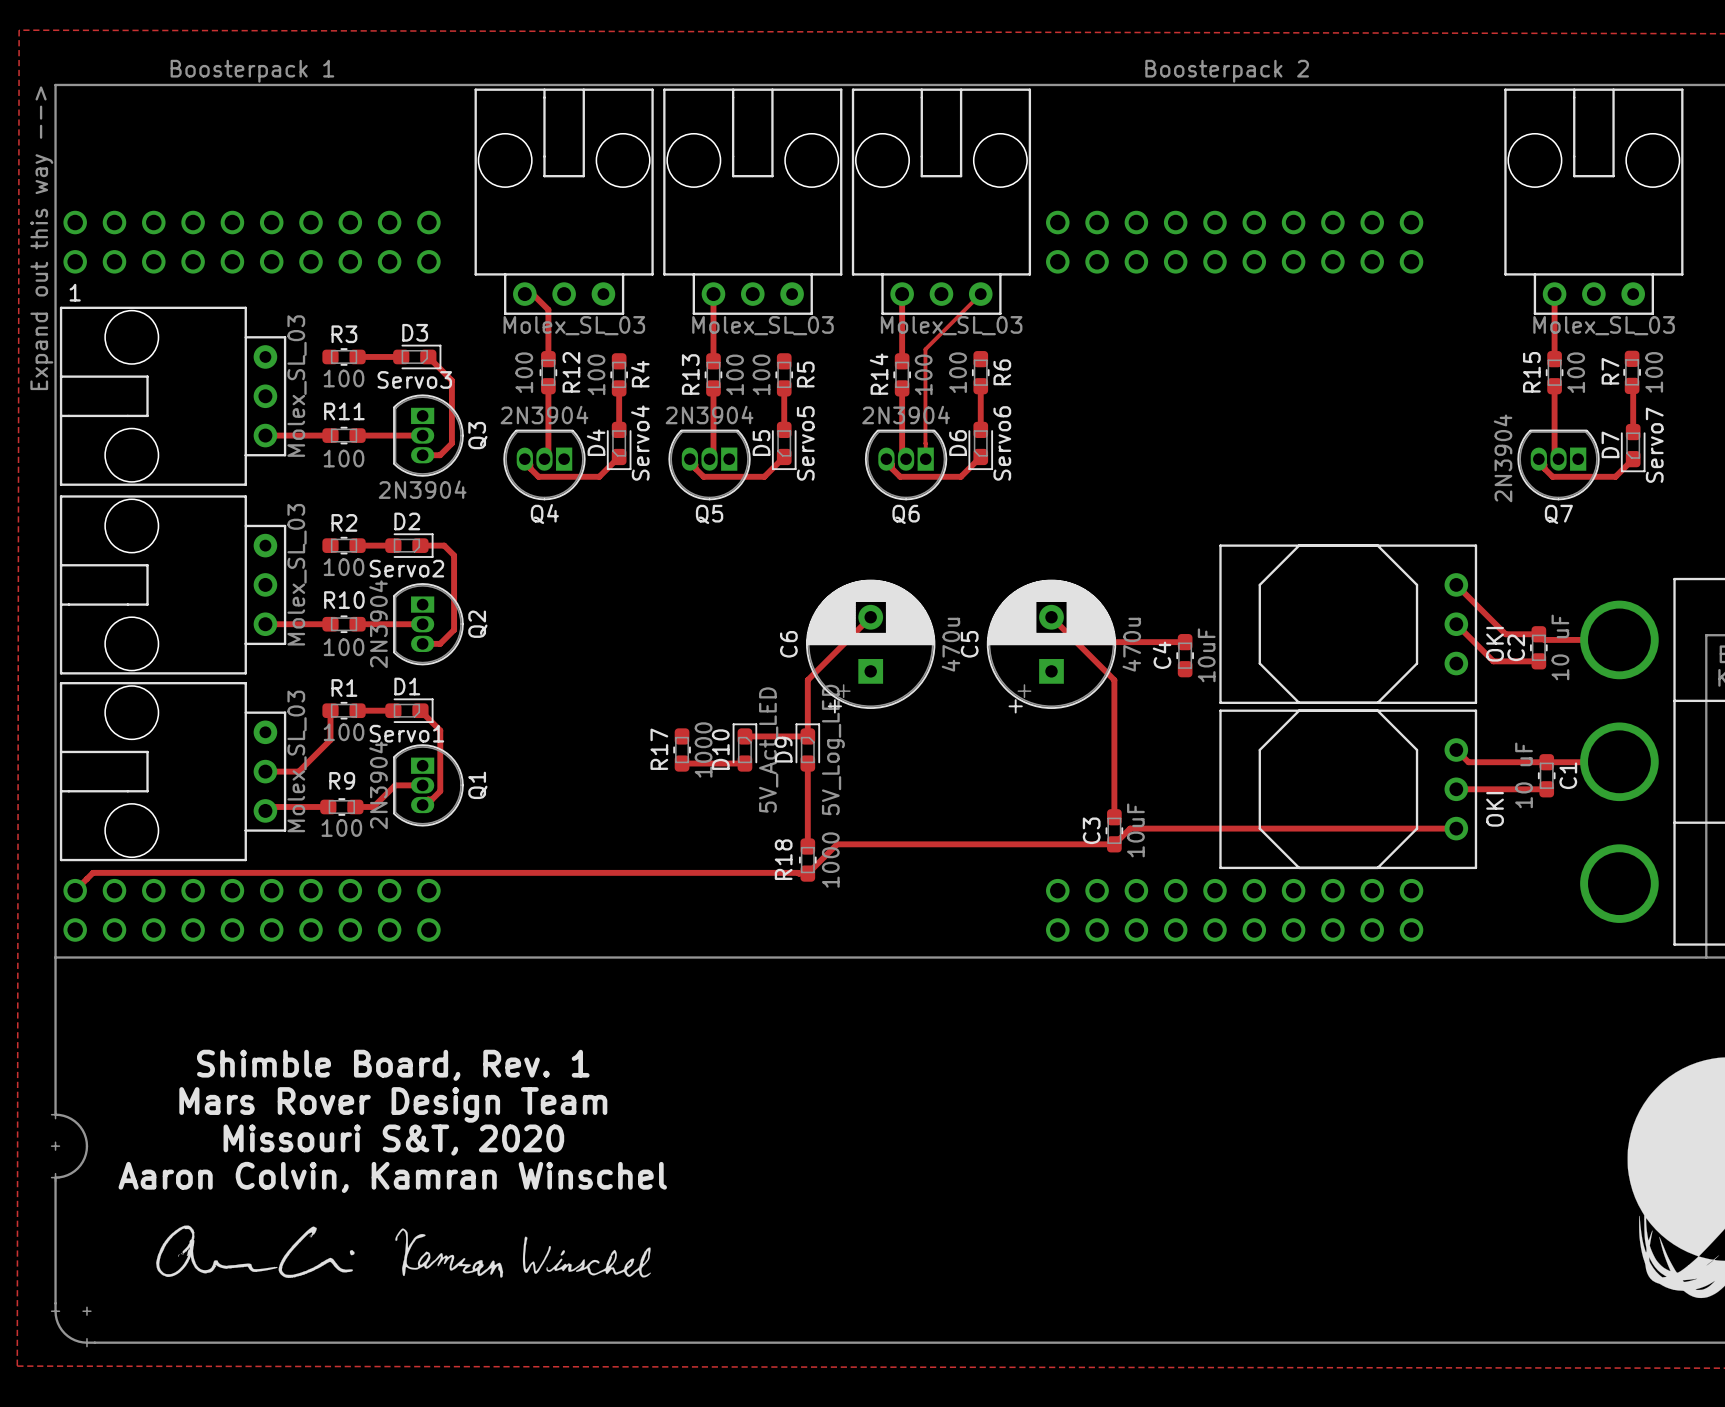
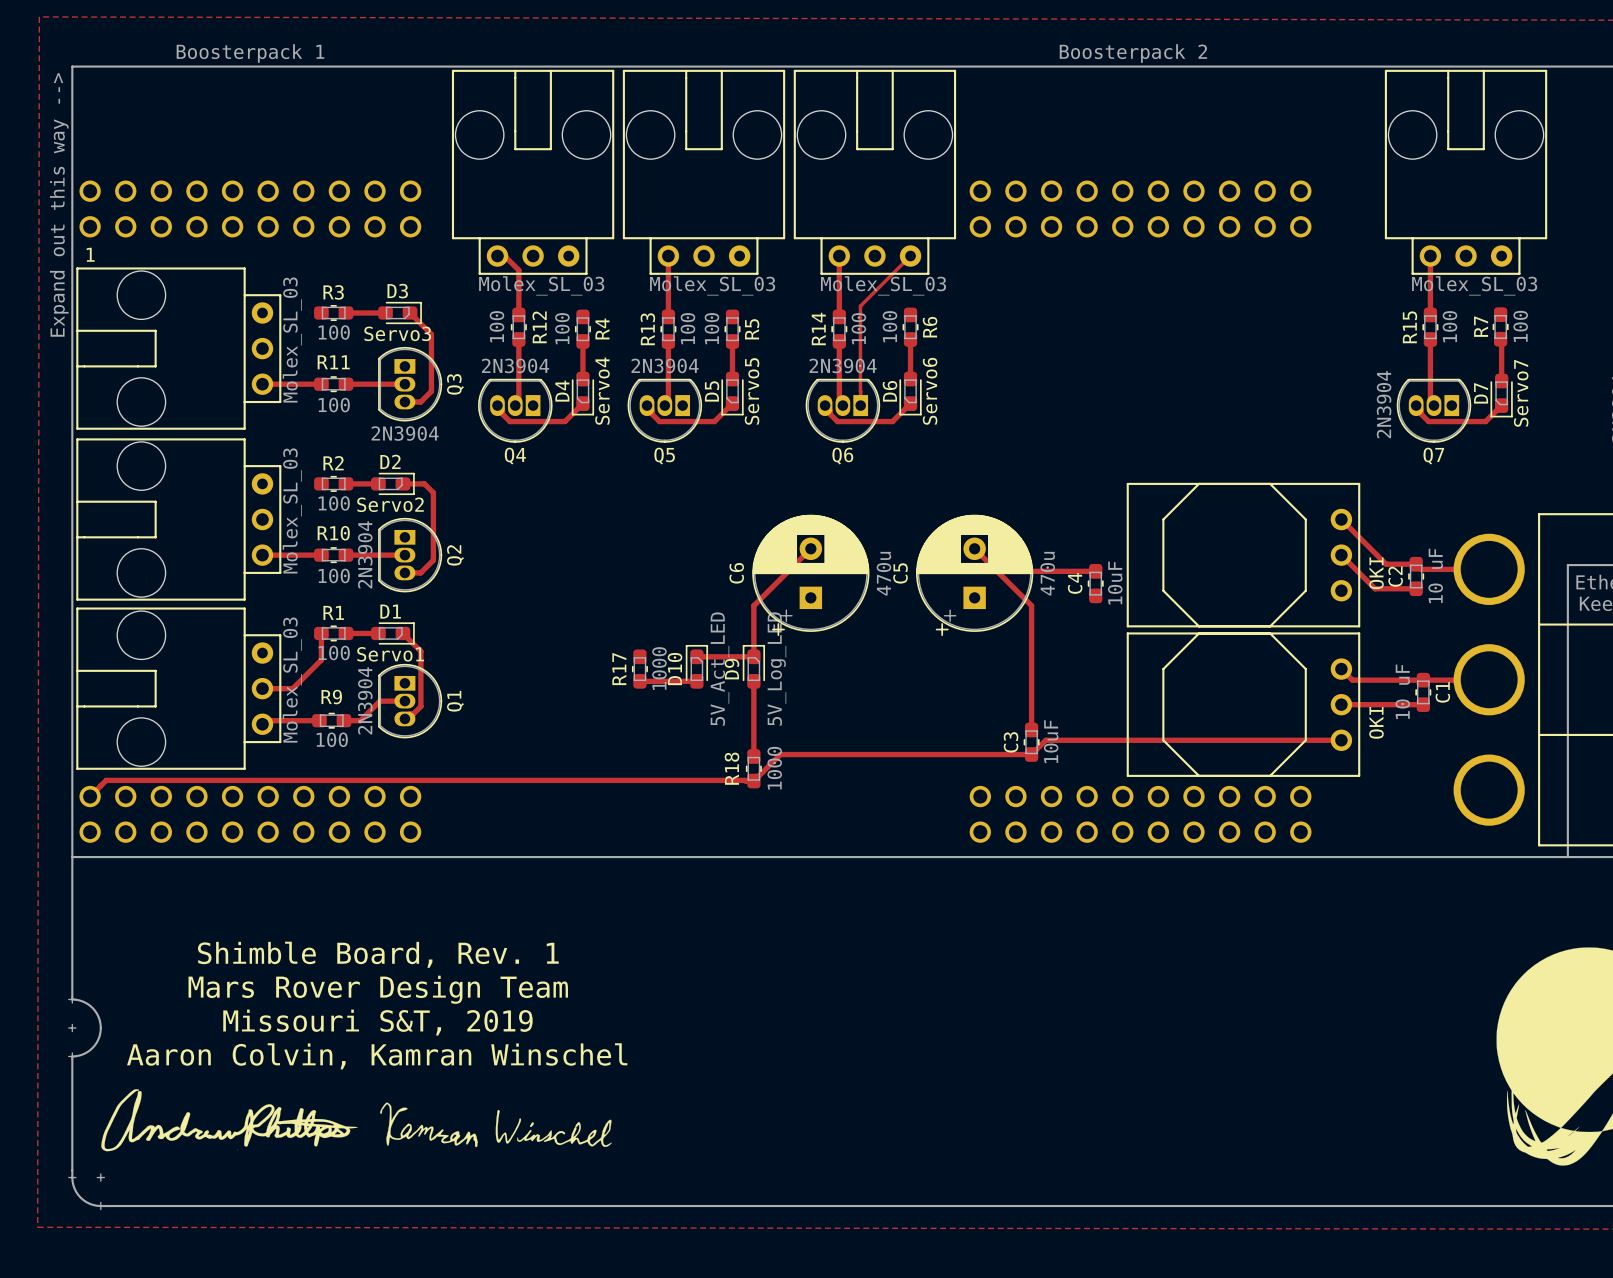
text: Missouri S&T, 2020 (393, 1140) -> Missouri S&T, 2019 (377, 1022)
drawing: none -> [101, 1089, 358, 1158]
drawing: [156, 1225, 355, 1279] -> none

